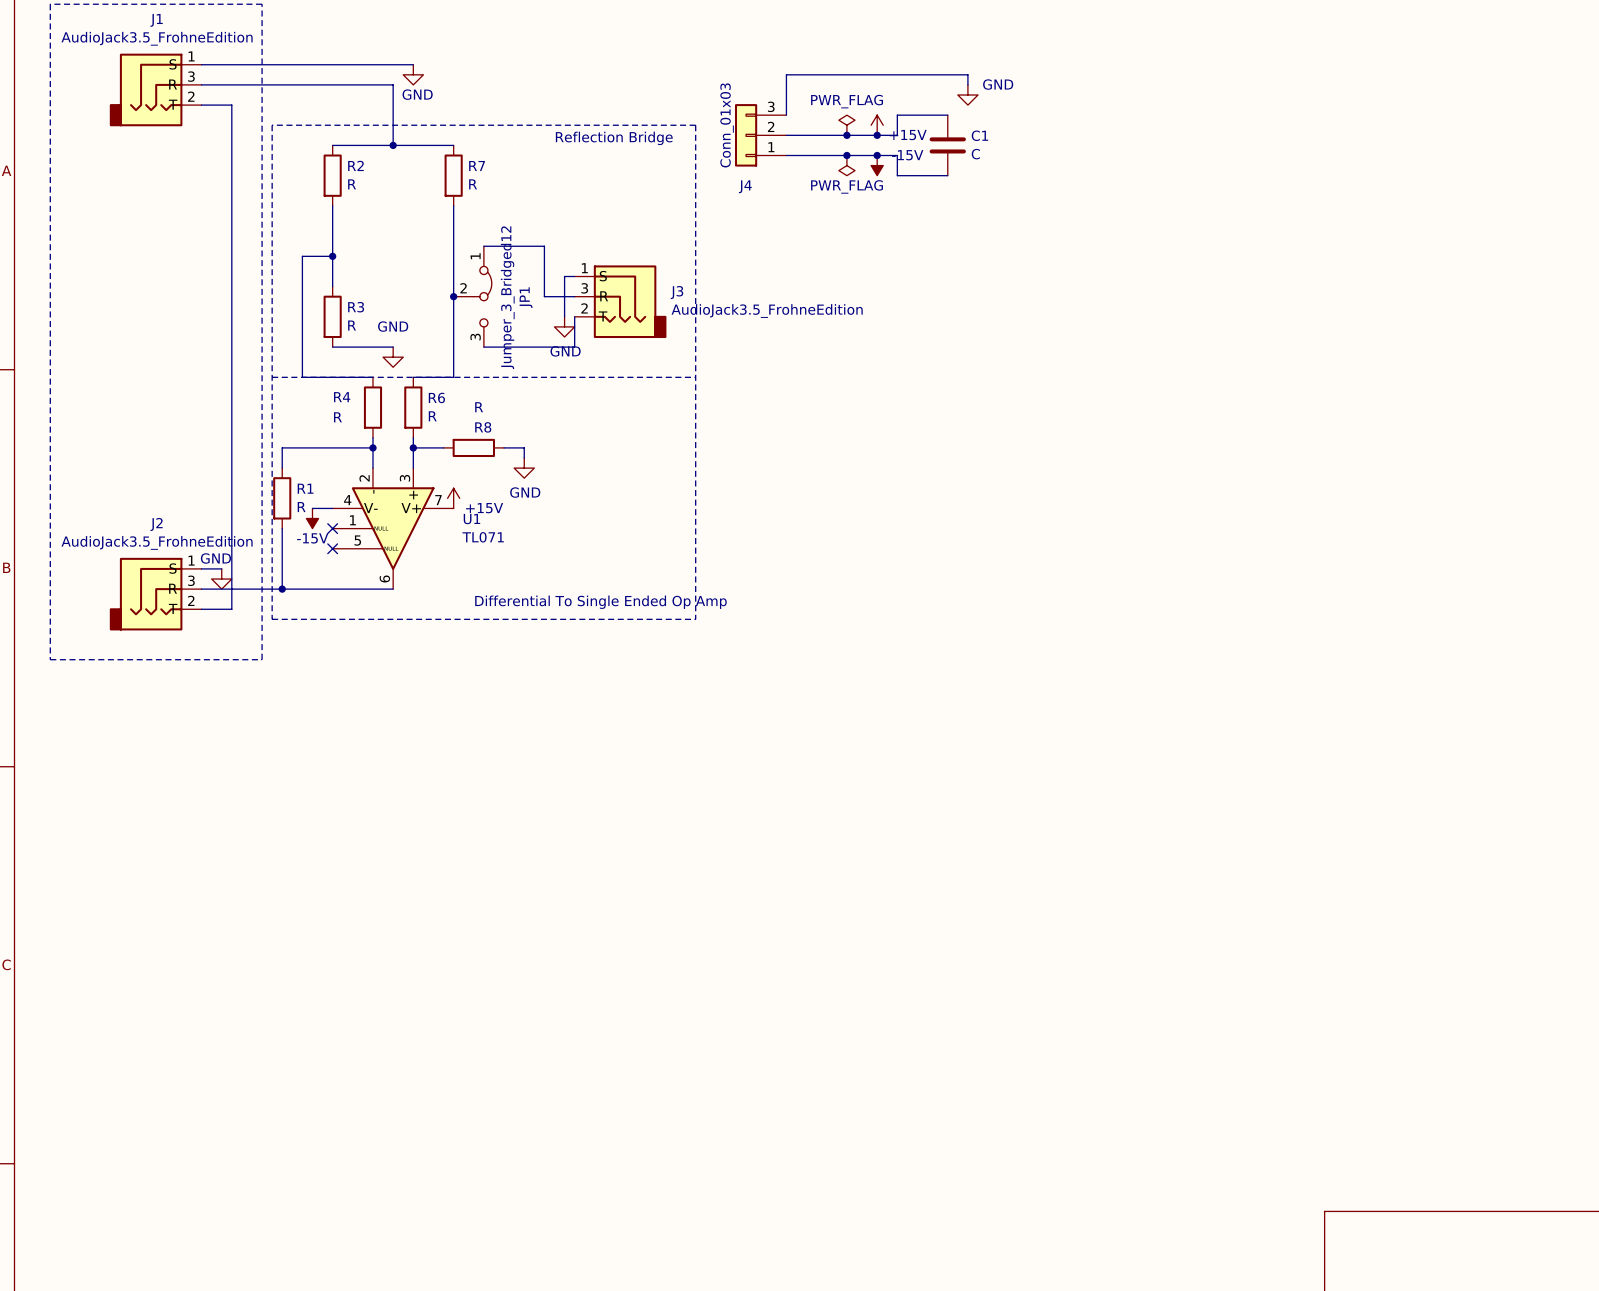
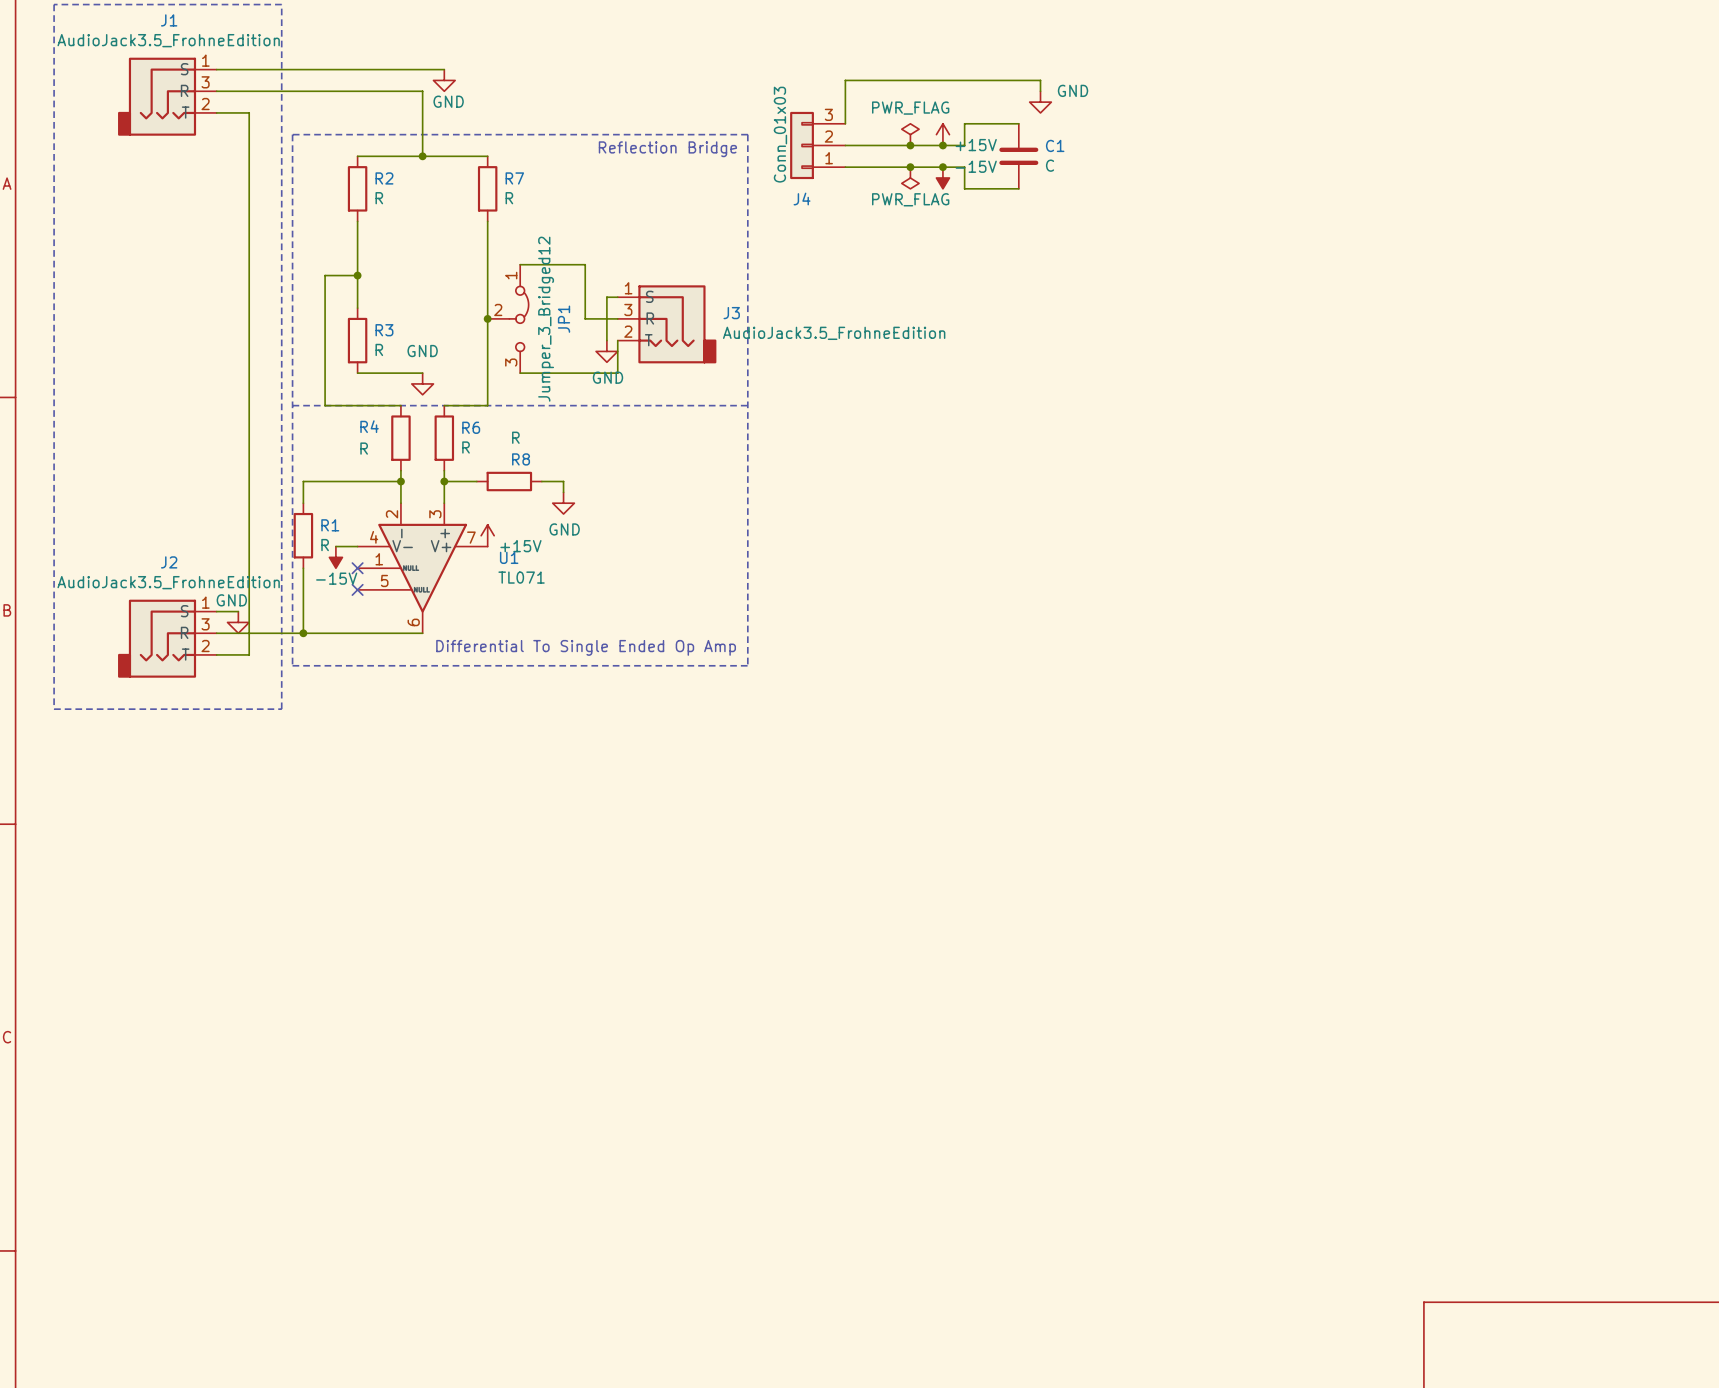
text position: Differential To Single Ended Op Amp (600, 602) -> Differential To Single Ended Op Amp (586, 647)

